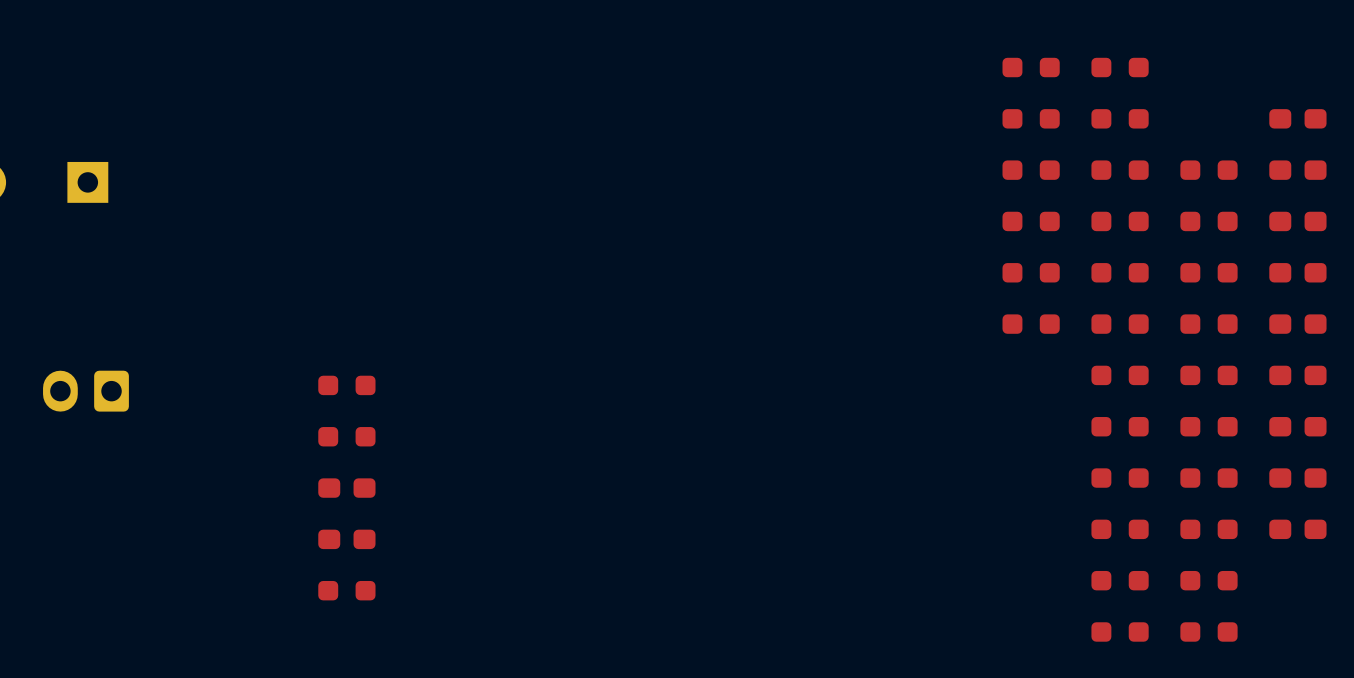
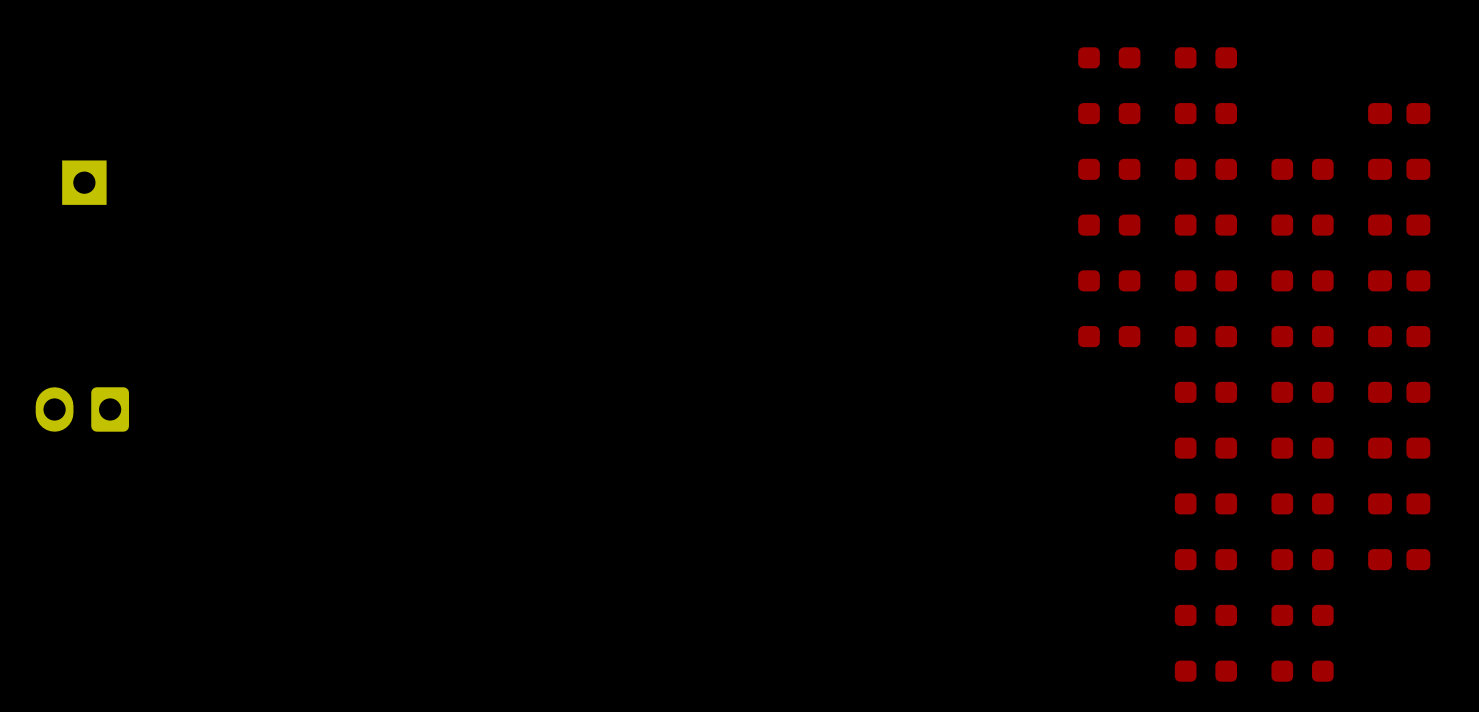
part: (346, 385) -> none
part: (346, 436) -> none
part: (346, 488) -> none
part: (346, 539) -> none
part: (346, 590) -> none

